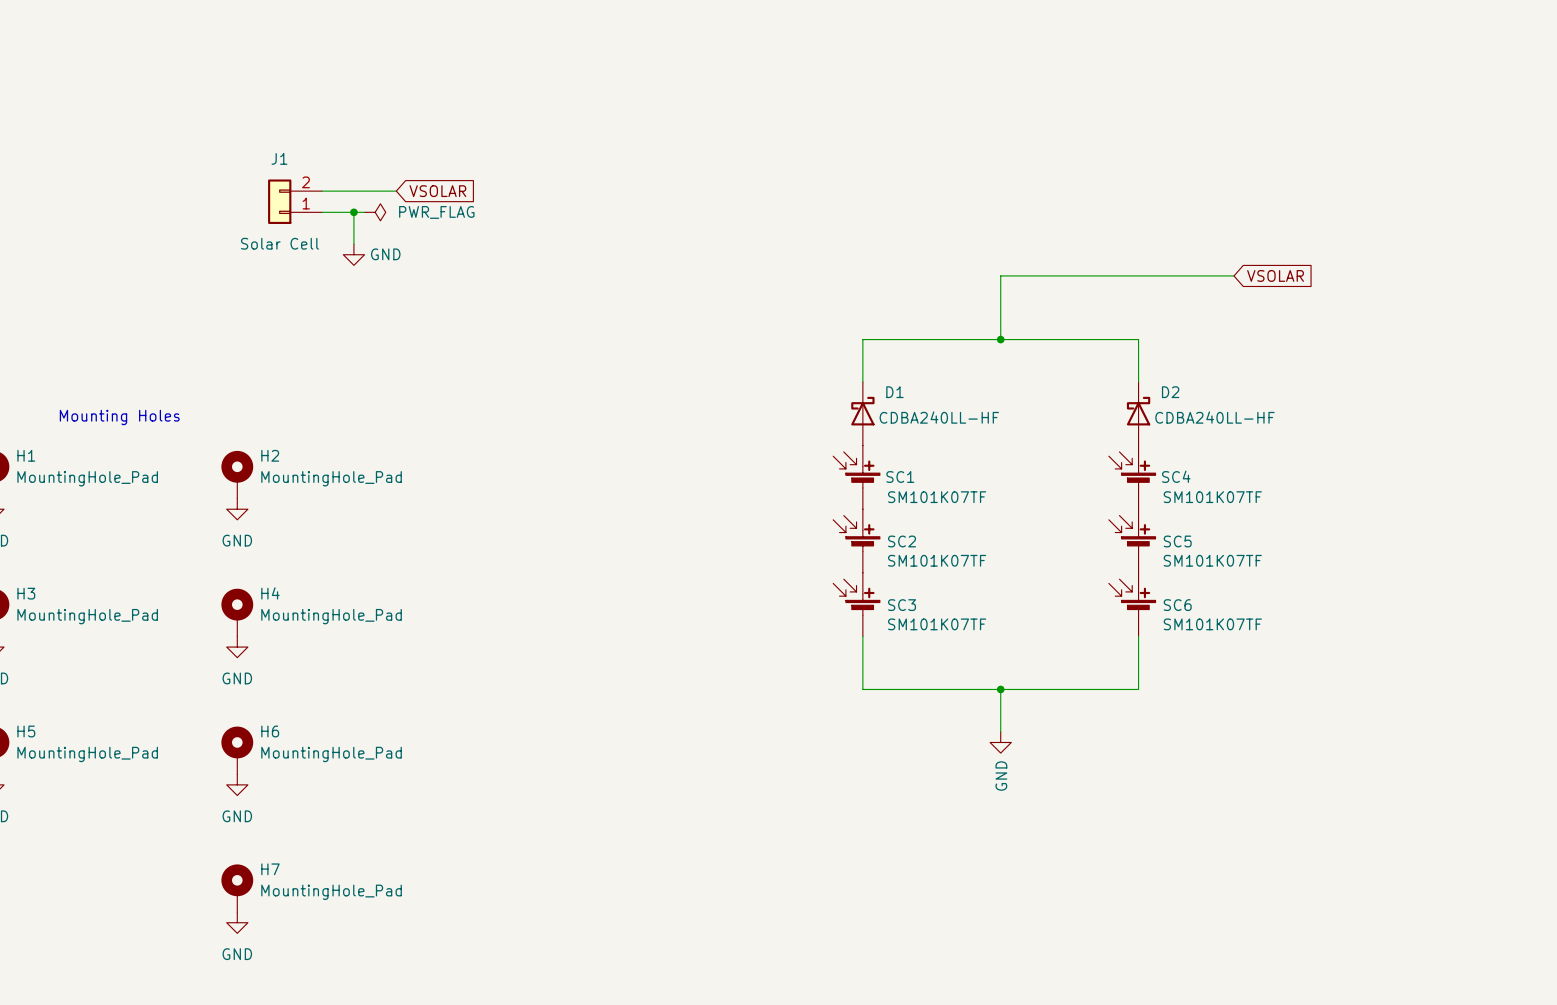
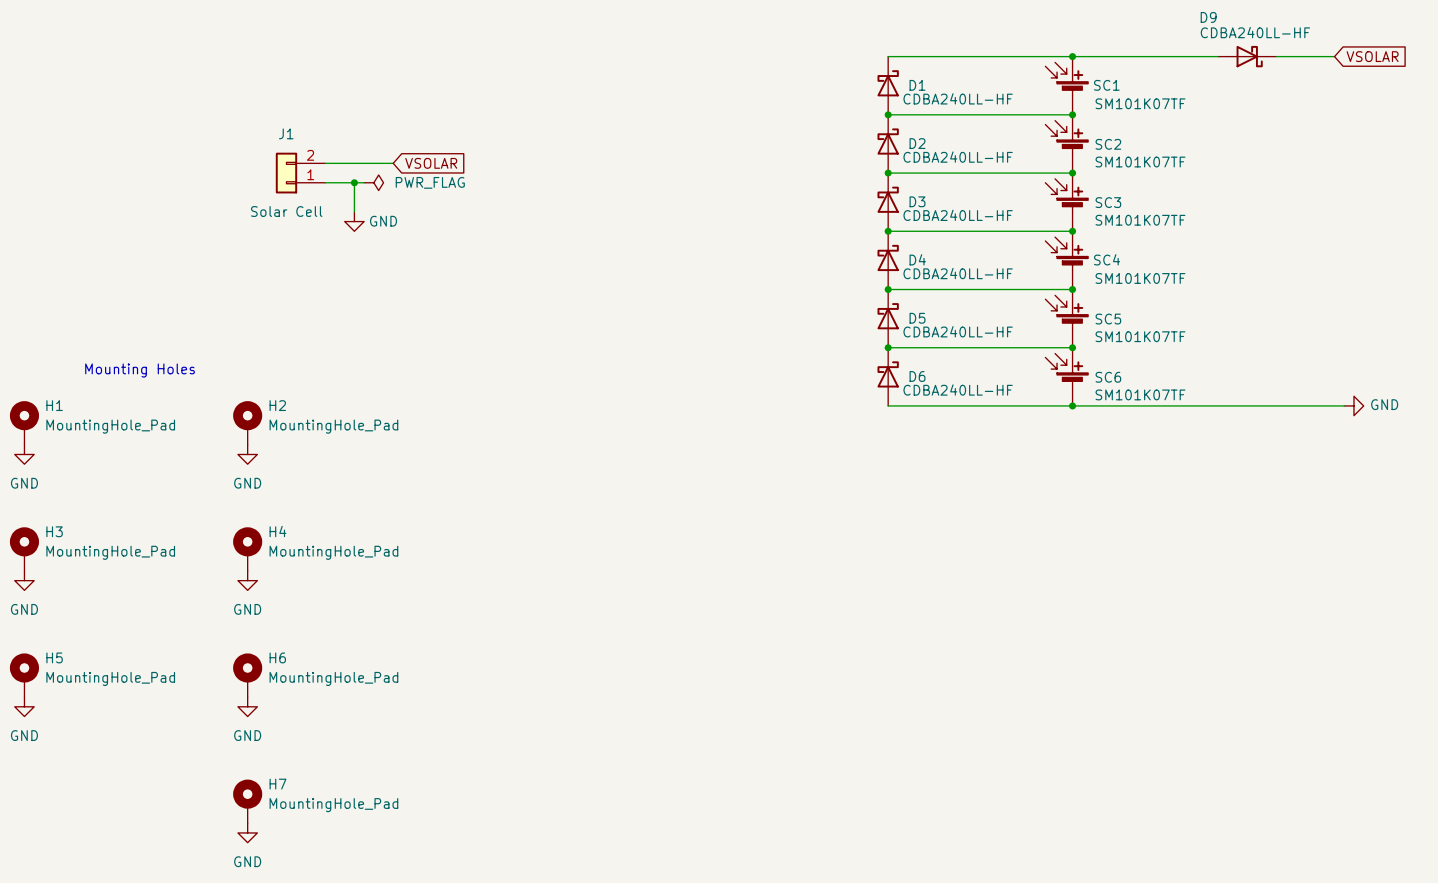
wire: none -> (888, 56) (1218, 56)
junction: none -> (1072, 56)
D9: none -> CDBA240LL-HF (1247, 56)
wire: none -> (1276, 56) (1334, 56)
global label: none -> VSOLAR (1372, 56)
wire: none -> (888, 114) (1072, 114)
junction: none -> (888, 114)
junction: none -> (1072, 114)
wire: none -> (888, 173) (1072, 173)
junction: none -> (888, 173)
junction: none -> (1072, 173)
D3: none -> CDBA240LL-HF (888, 202)
wire: none -> (888, 231) (1072, 231)
junction: none -> (888, 231)
junction: none -> (1072, 231)
wire: (1233, 275) (1000, 275) (1000, 339) -> none
global label: VSOLAR (1275, 275) -> none
D4: none -> CDBA240LL-HF (888, 260)
wire: none -> (888, 289) (1072, 289)
junction: none -> (888, 289)
junction: none -> (1072, 289)
junction: (1000, 339) -> none
D5: none -> CDBA240LL-HF (888, 318)
wire: (862, 381) (862, 339) (1138, 339) (1138, 381) -> none
D1 name position: D1 (894, 392) -> D1 (917, 85)
wire: none -> (888, 347) (1072, 347)
junction: none -> (888, 347)
junction: none -> (1072, 347)
D2 name position: D2 (1170, 392) -> D2 (917, 143)
D1 position: (862, 413) -> (888, 85)
D2 position: (1138, 413) -> (888, 143)
D1 value position: CDBA240LL-HF (939, 417) -> CDBA240LL-HF (958, 98)
D2 value position: CDBA240LL-HF (1214, 417) -> CDBA240LL-HF (958, 157)
D6: none -> CDBA240LL-HF (888, 376)
wire: none -> (888, 405) (1344, 405)
junction: none -> (1072, 405)
power symbol: none -> GND (1353, 405)
SC1 position: (856, 477) -> (1066, 85)
SC4 position: (1132, 477) -> (1066, 260)
SC2 position: (856, 541) -> (1066, 143)
SC5 position: (1132, 541) -> (1066, 318)
SC3 position: (856, 604) -> (1066, 202)
SC6 position: (1132, 604) -> (1066, 376)
wire: (862, 636) (862, 689) (1138, 689) (1138, 636) -> none
wire: (1000, 689) (1000, 731) -> none
junction: (1000, 689) -> none
power symbol: GND (1000, 742) -> none

